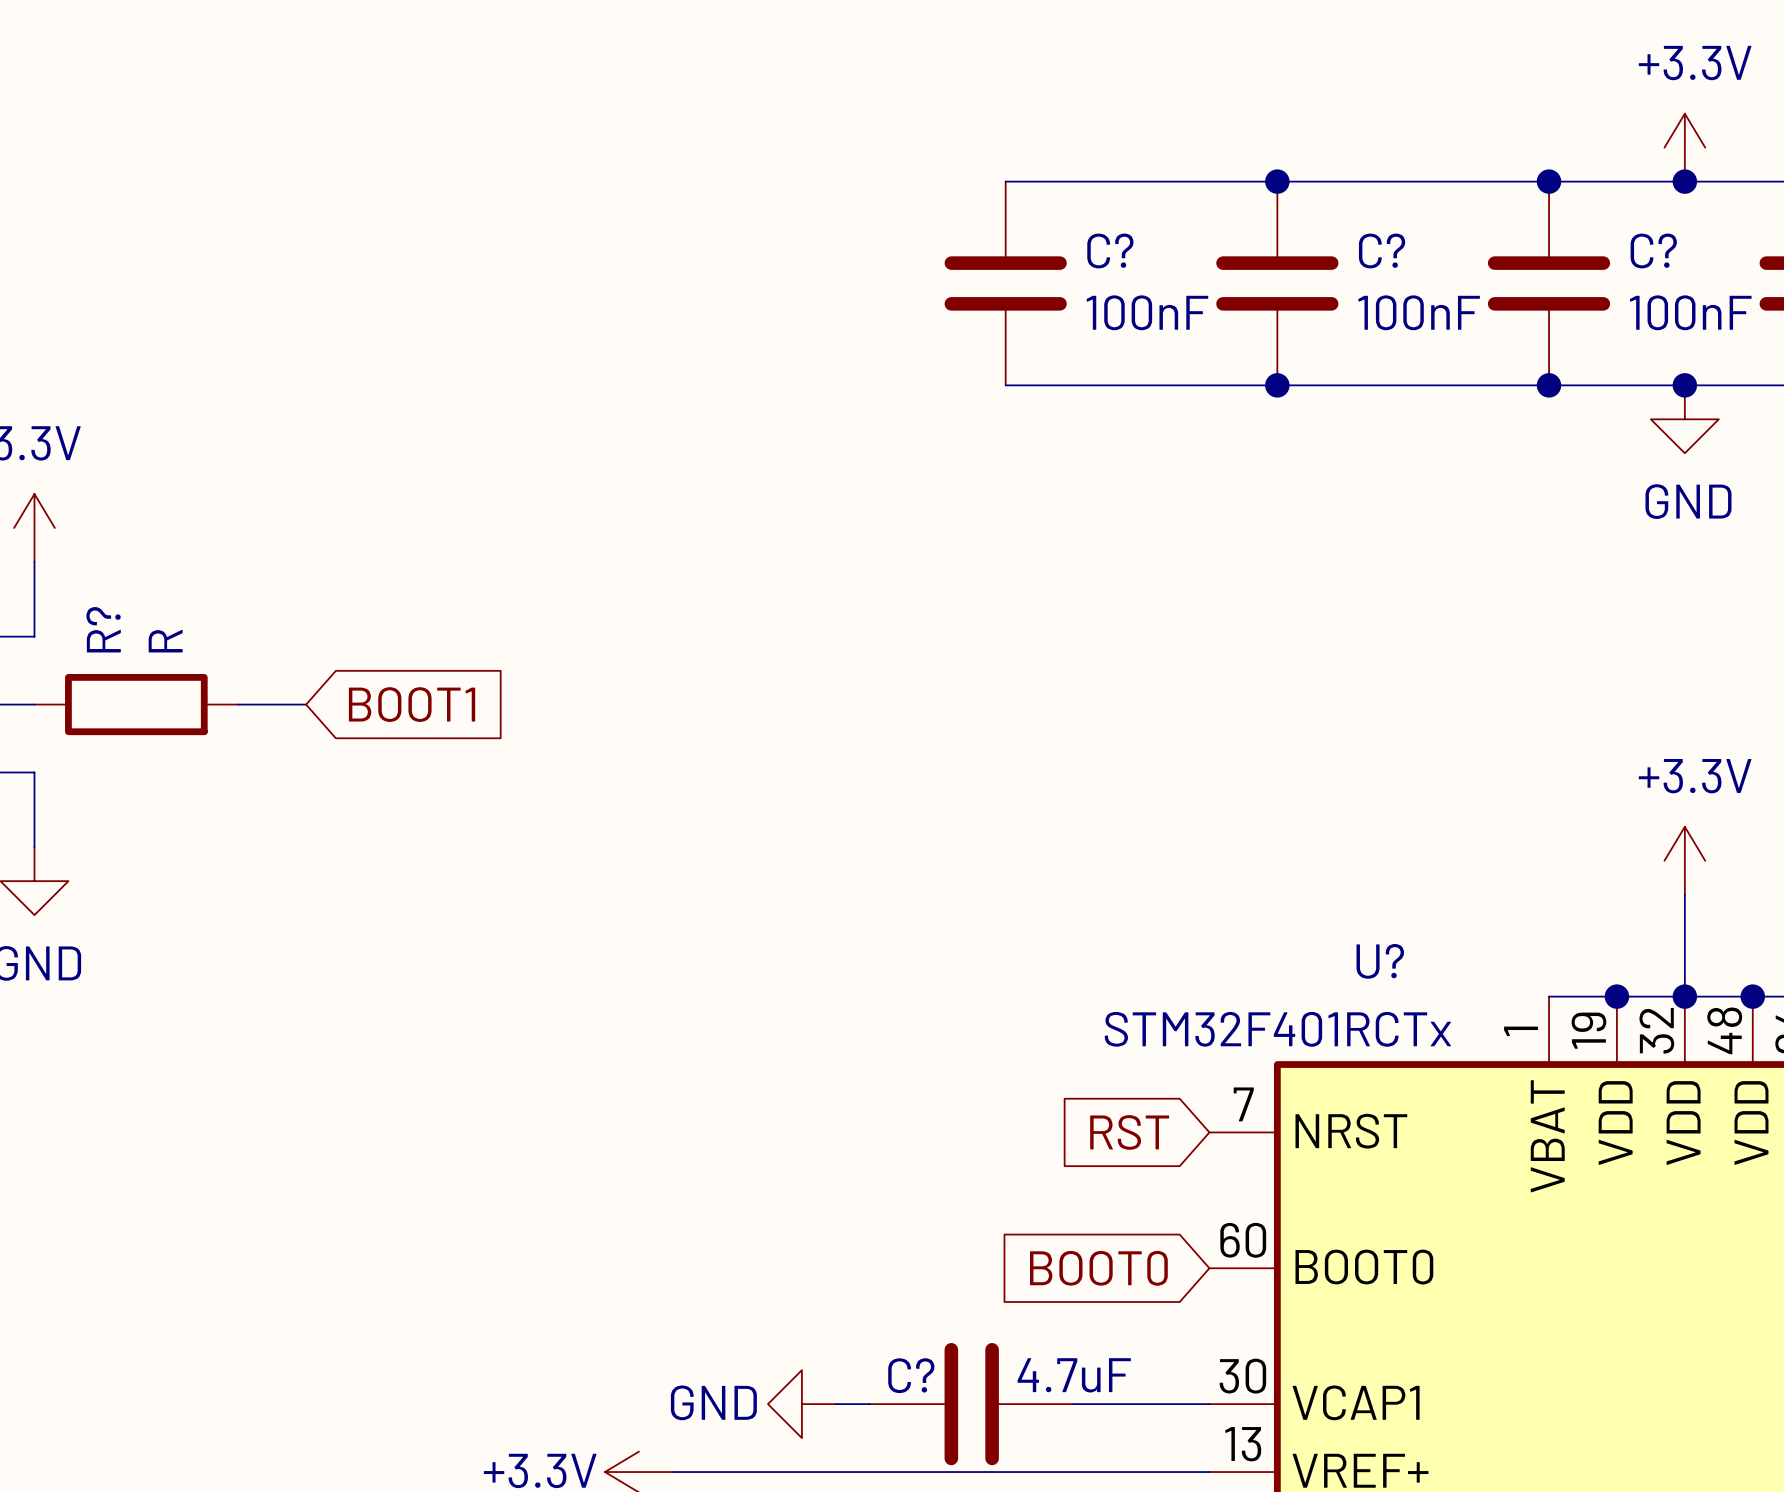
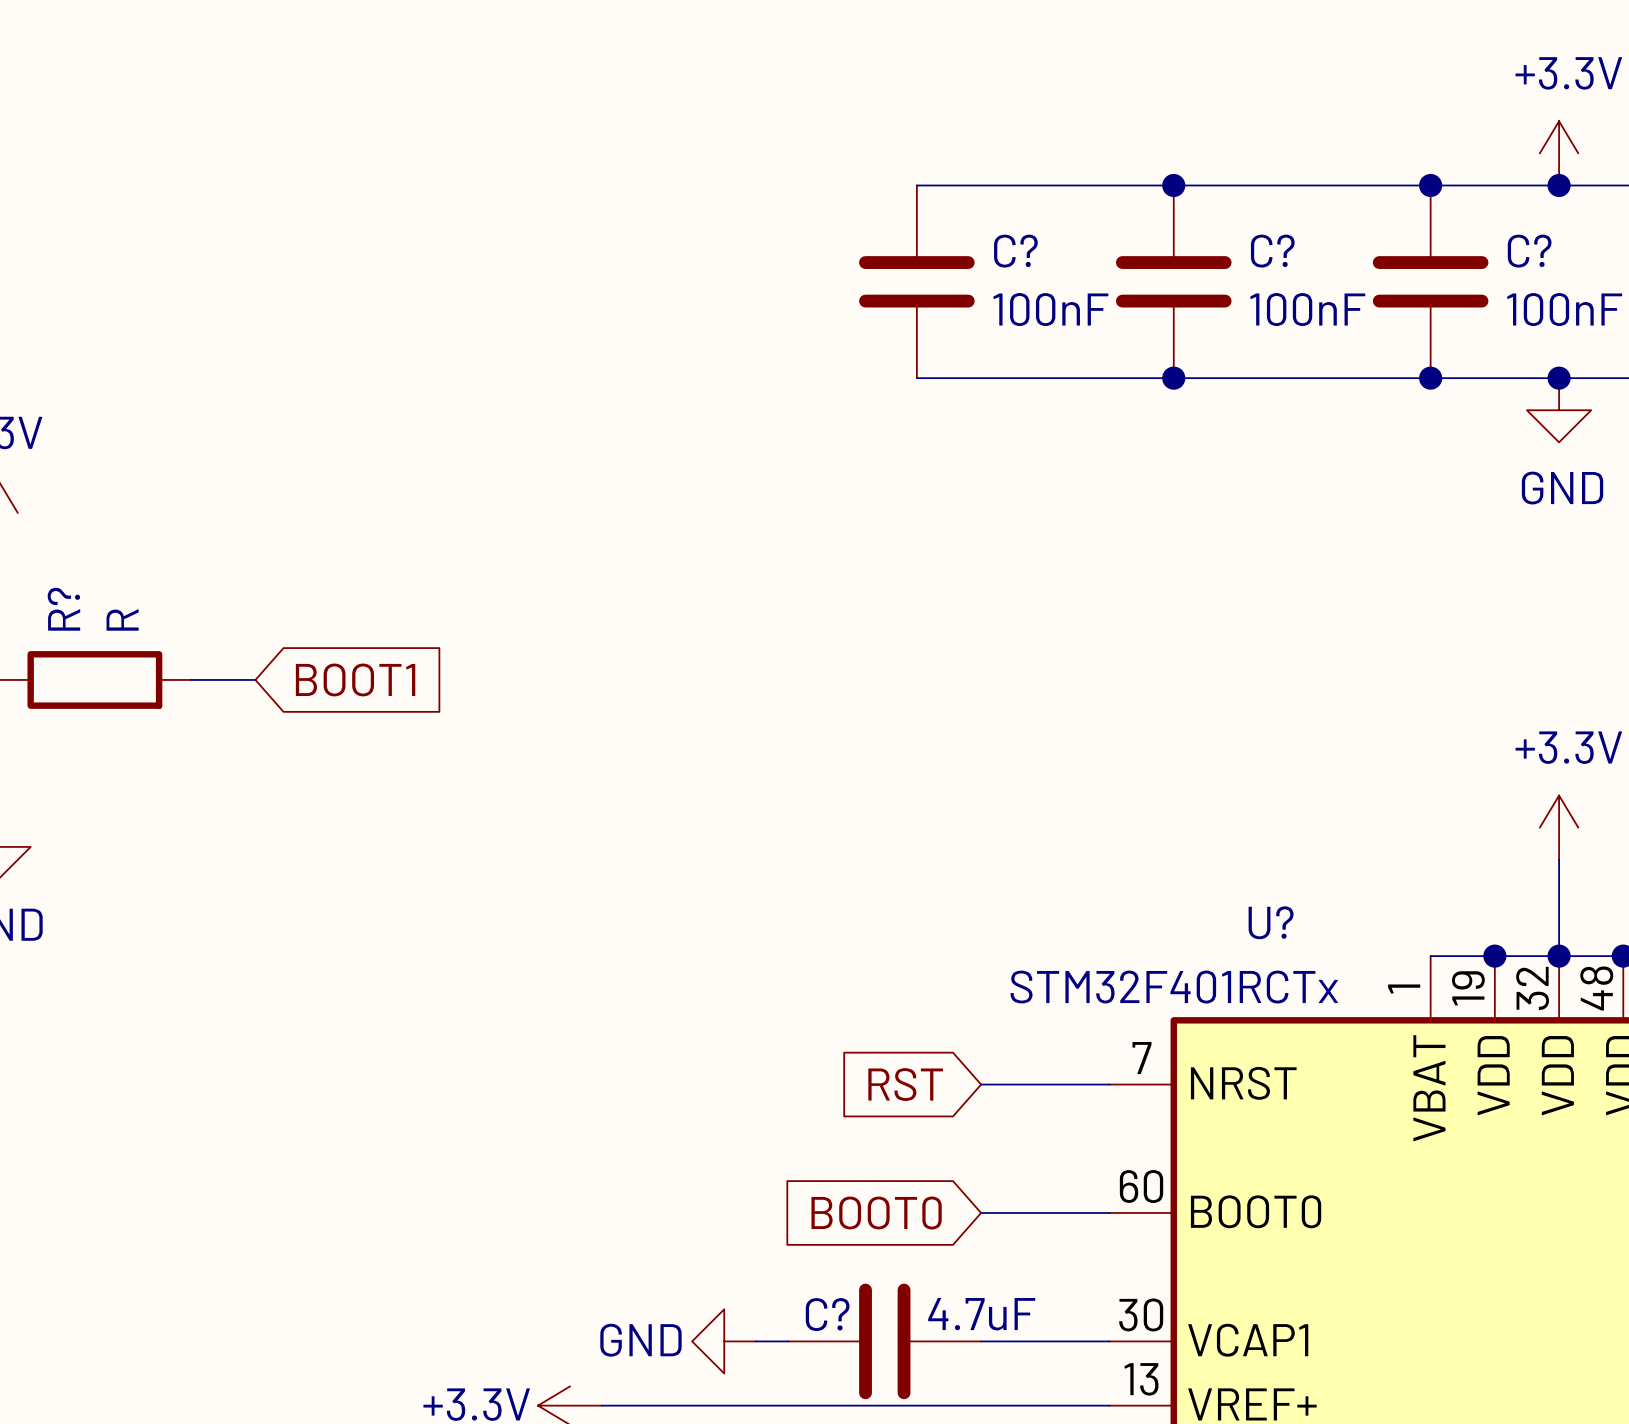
wire: none -> (981, 1084) (1109, 1084)
global label position: RST (1129, 1132) -> RST (905, 1084)
wire: none -> (981, 1212) (1109, 1212)
global label position: BOOT0 (1098, 1268) -> BOOT0 (876, 1213)

